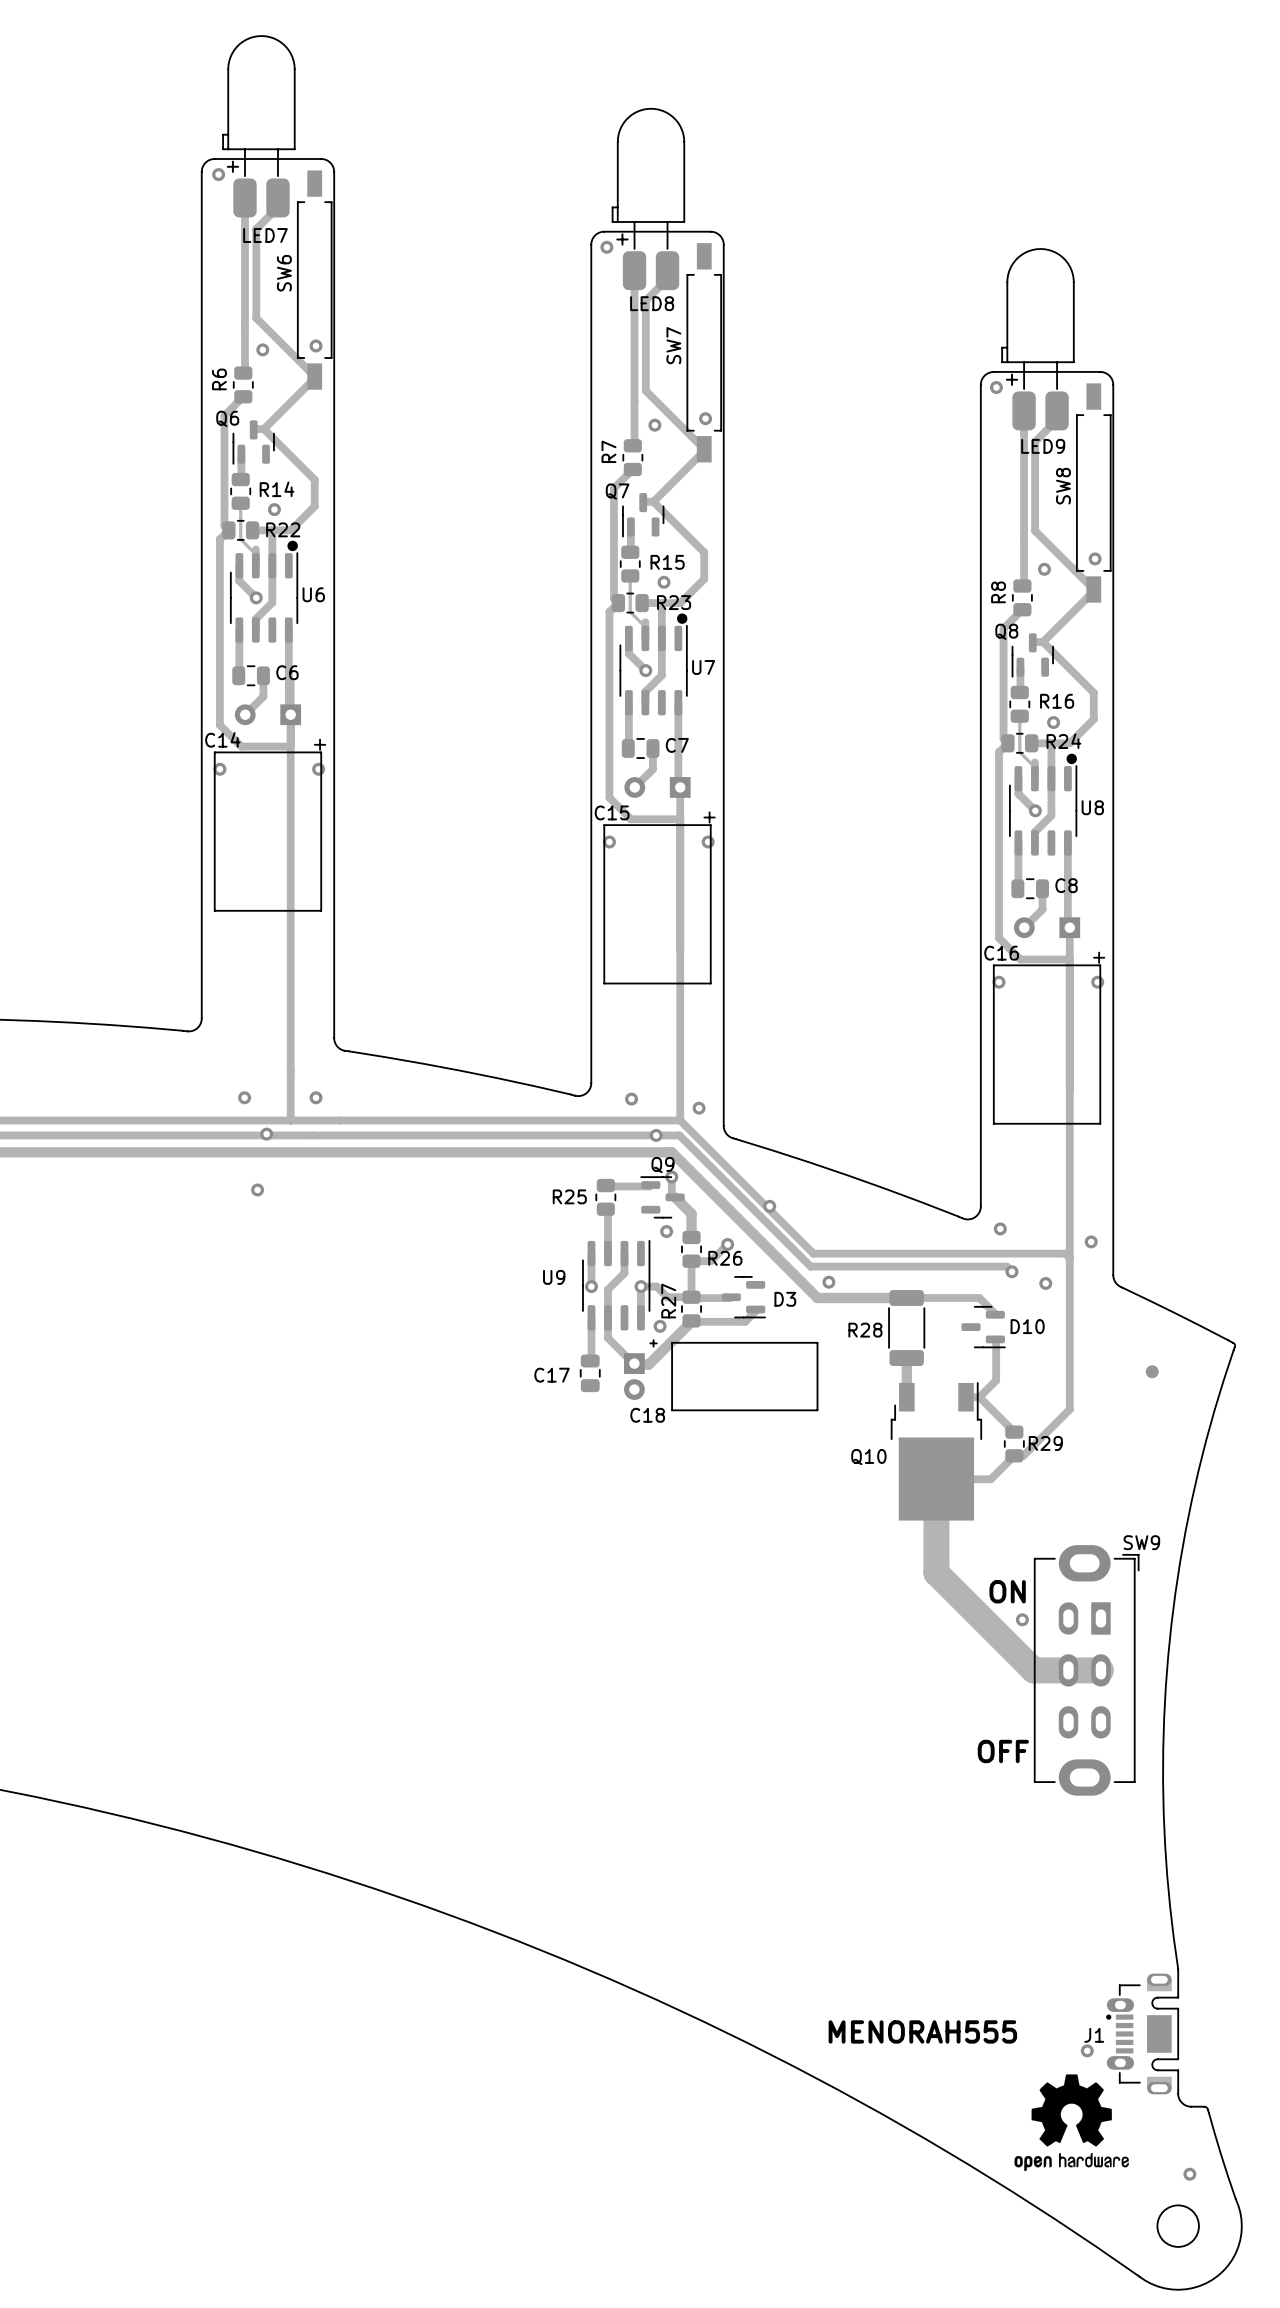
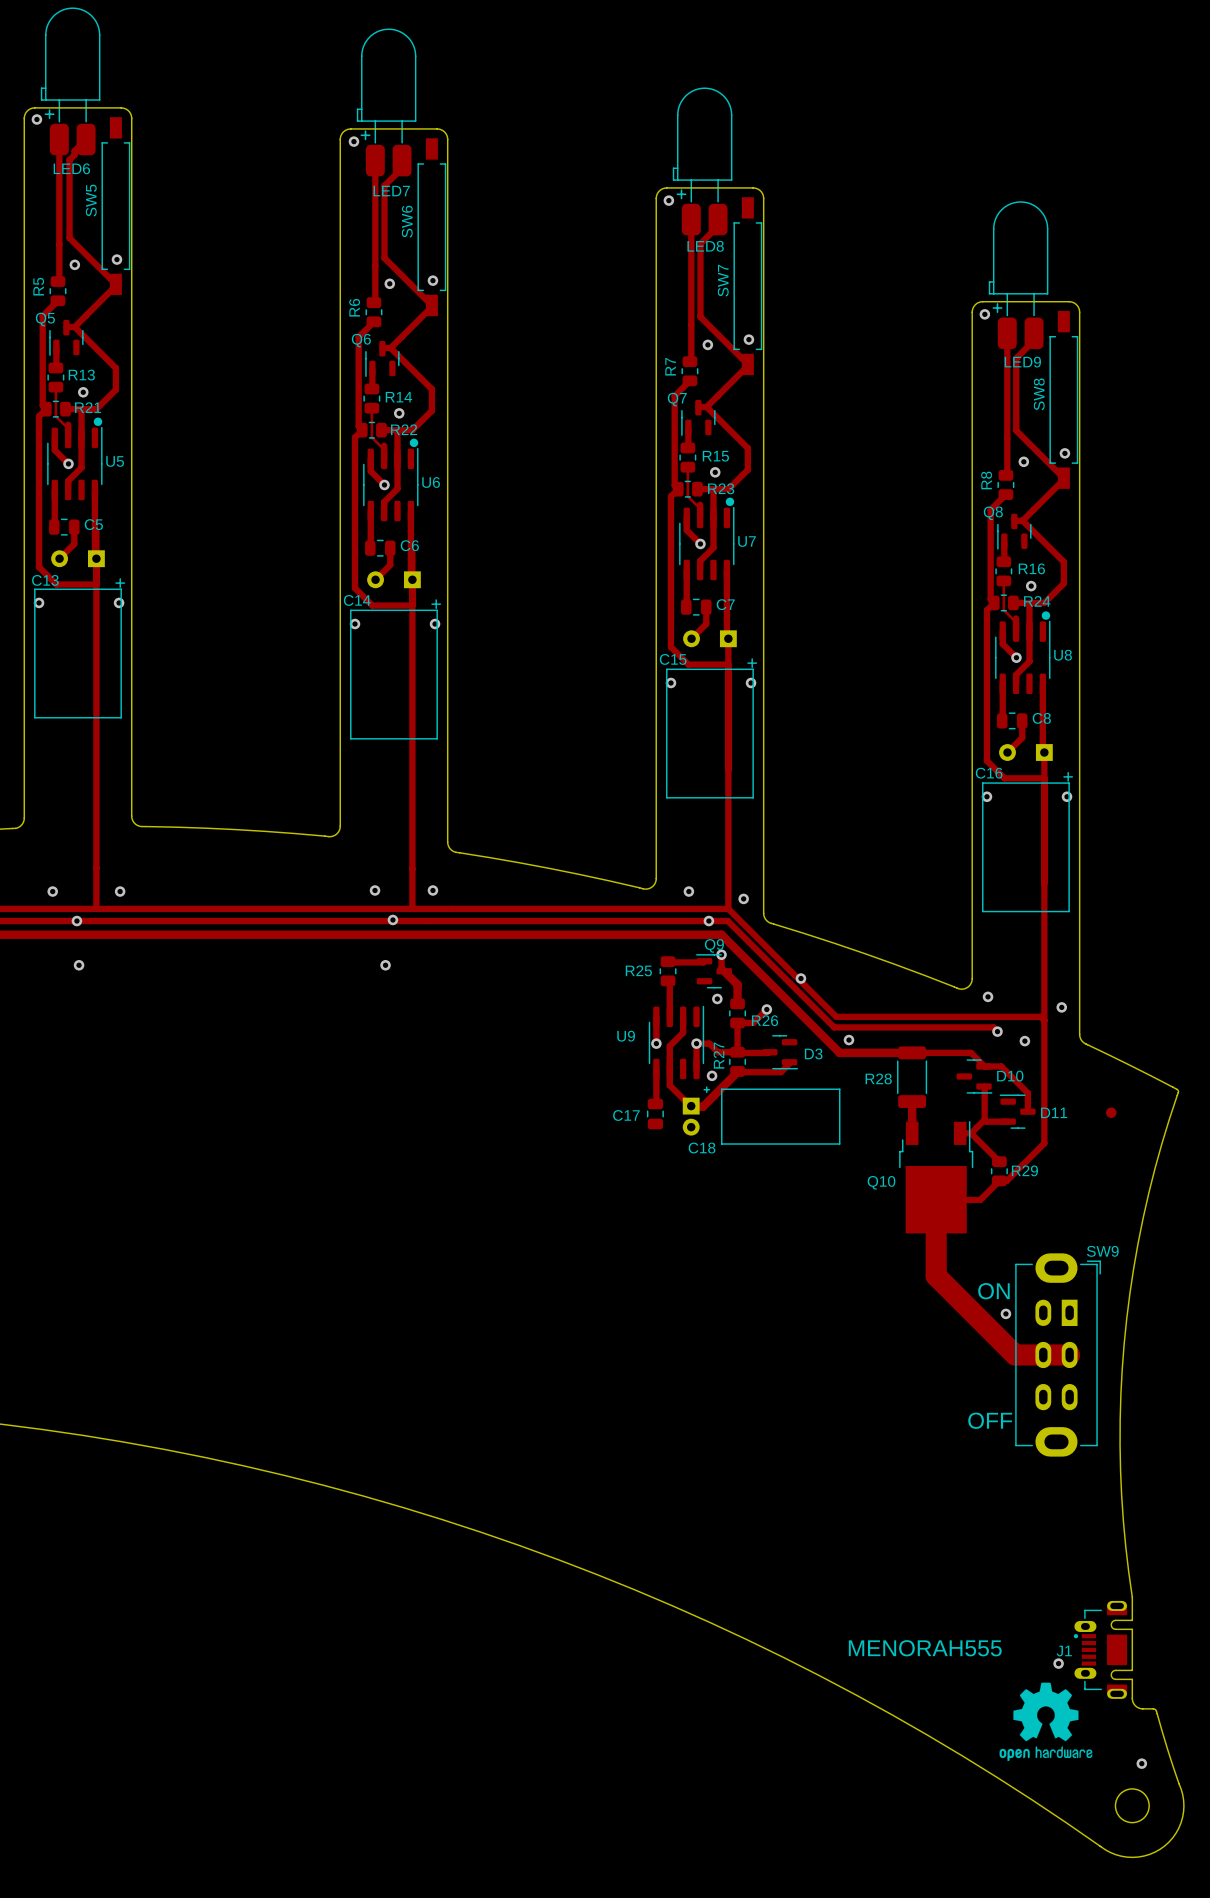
track: none -> (983, 1066) (1001, 1066) (1027, 1093) (1027, 1111)
D11: none -> (1017, 1111)
track: none -> (984, 1119) (986, 1121) (1008, 1121)

